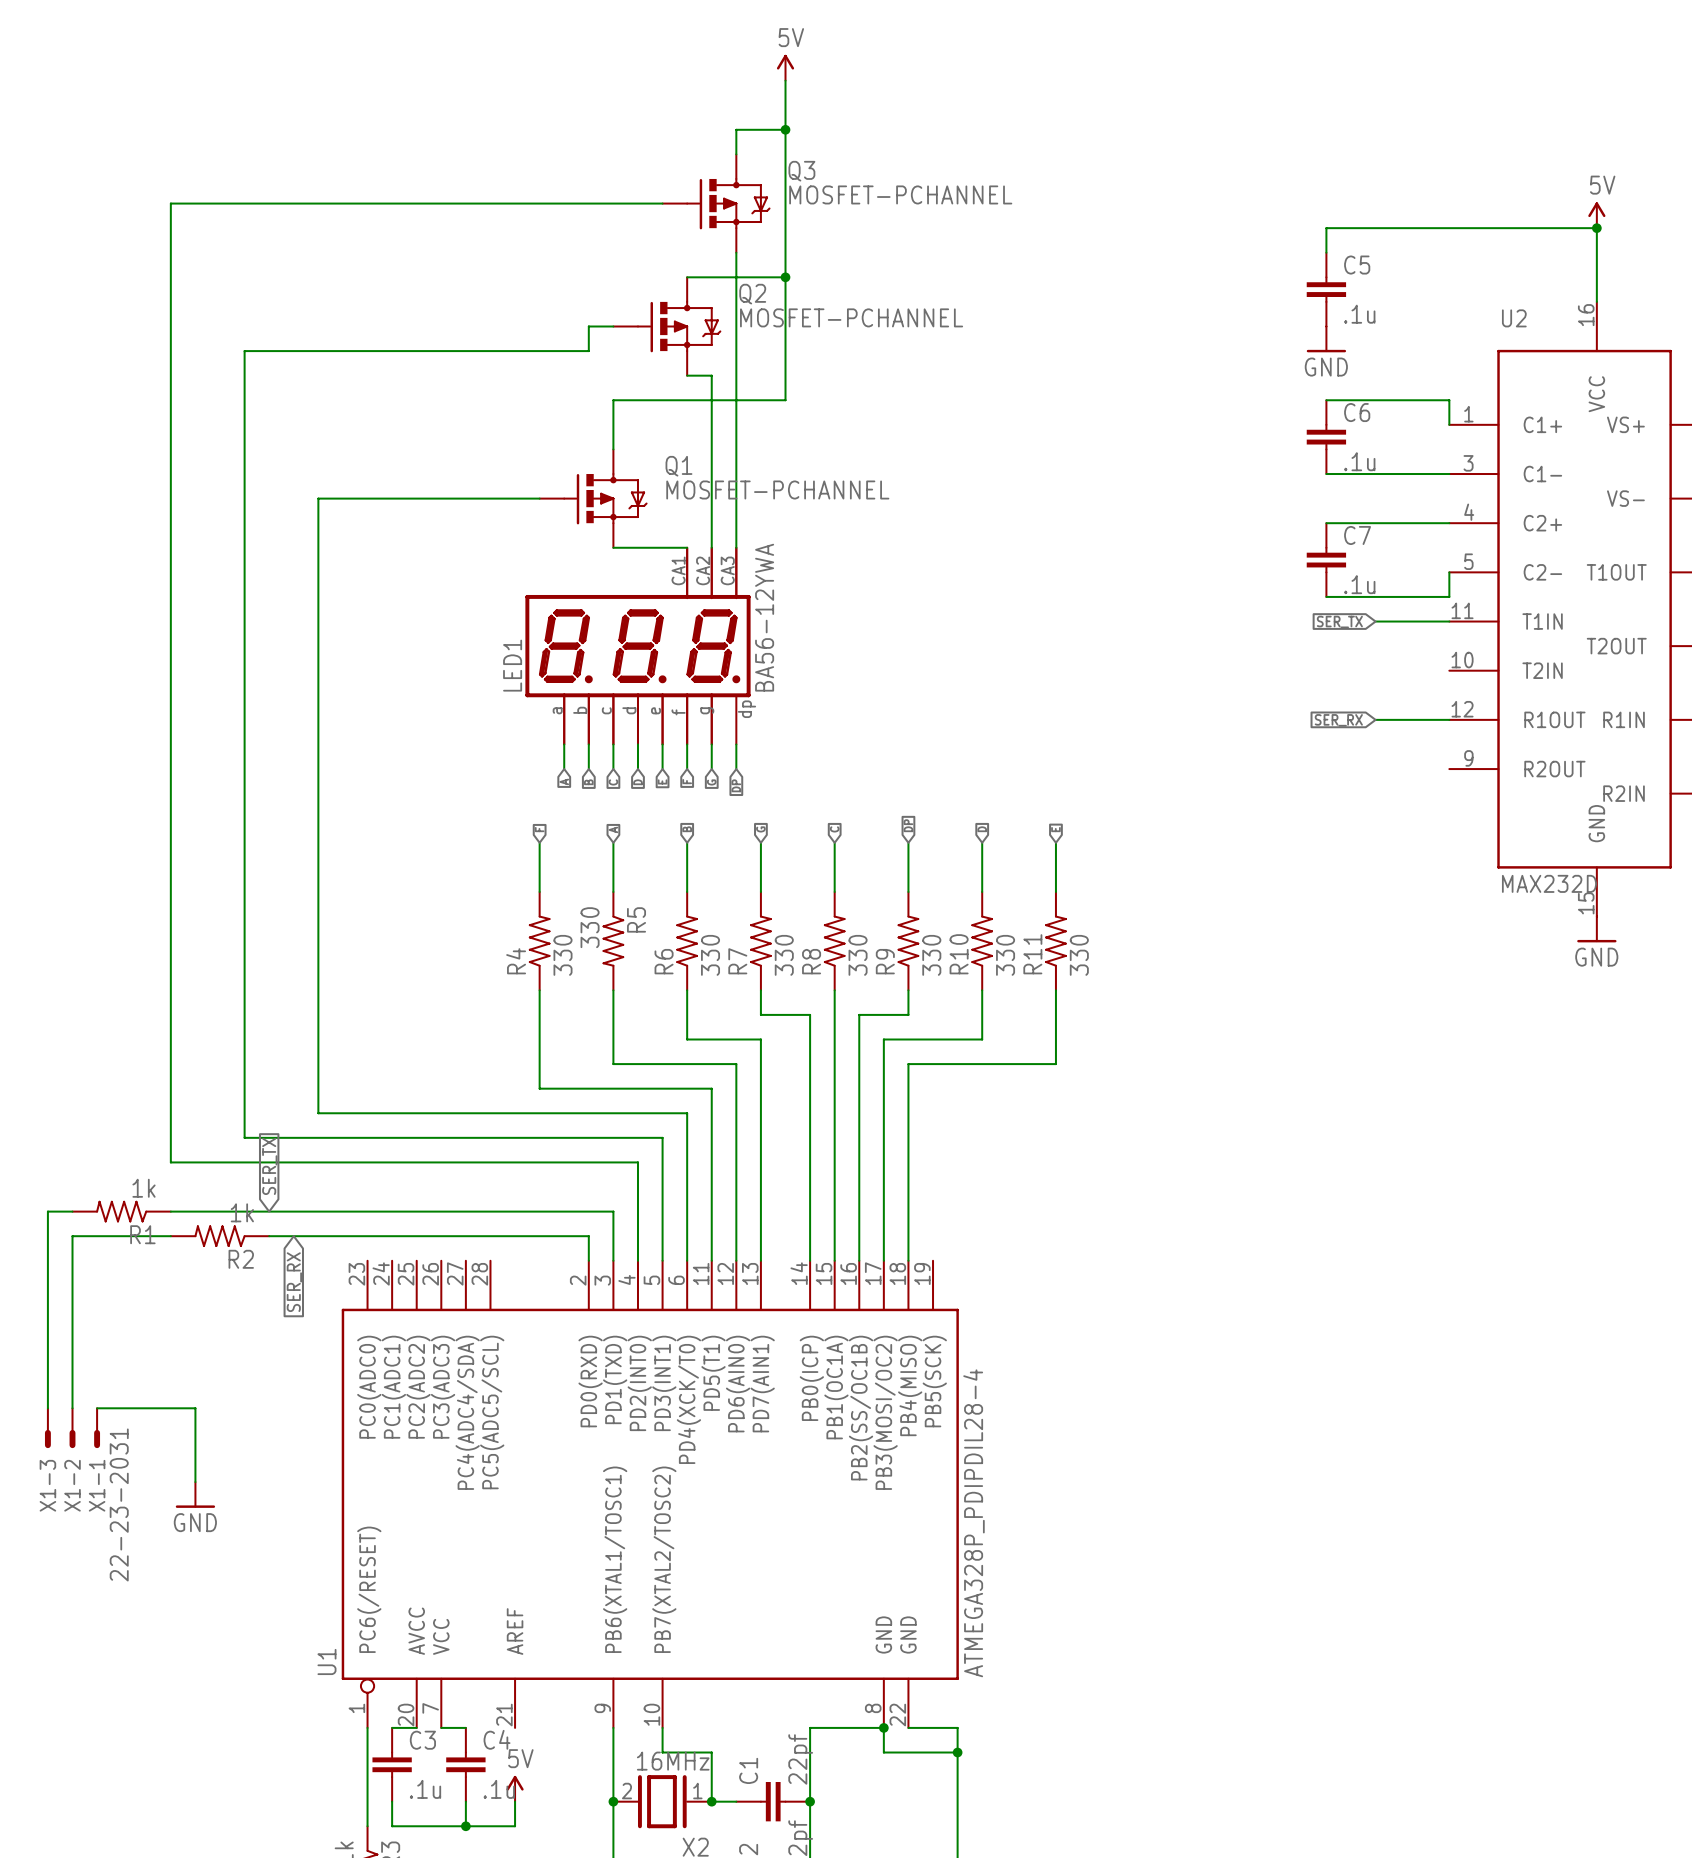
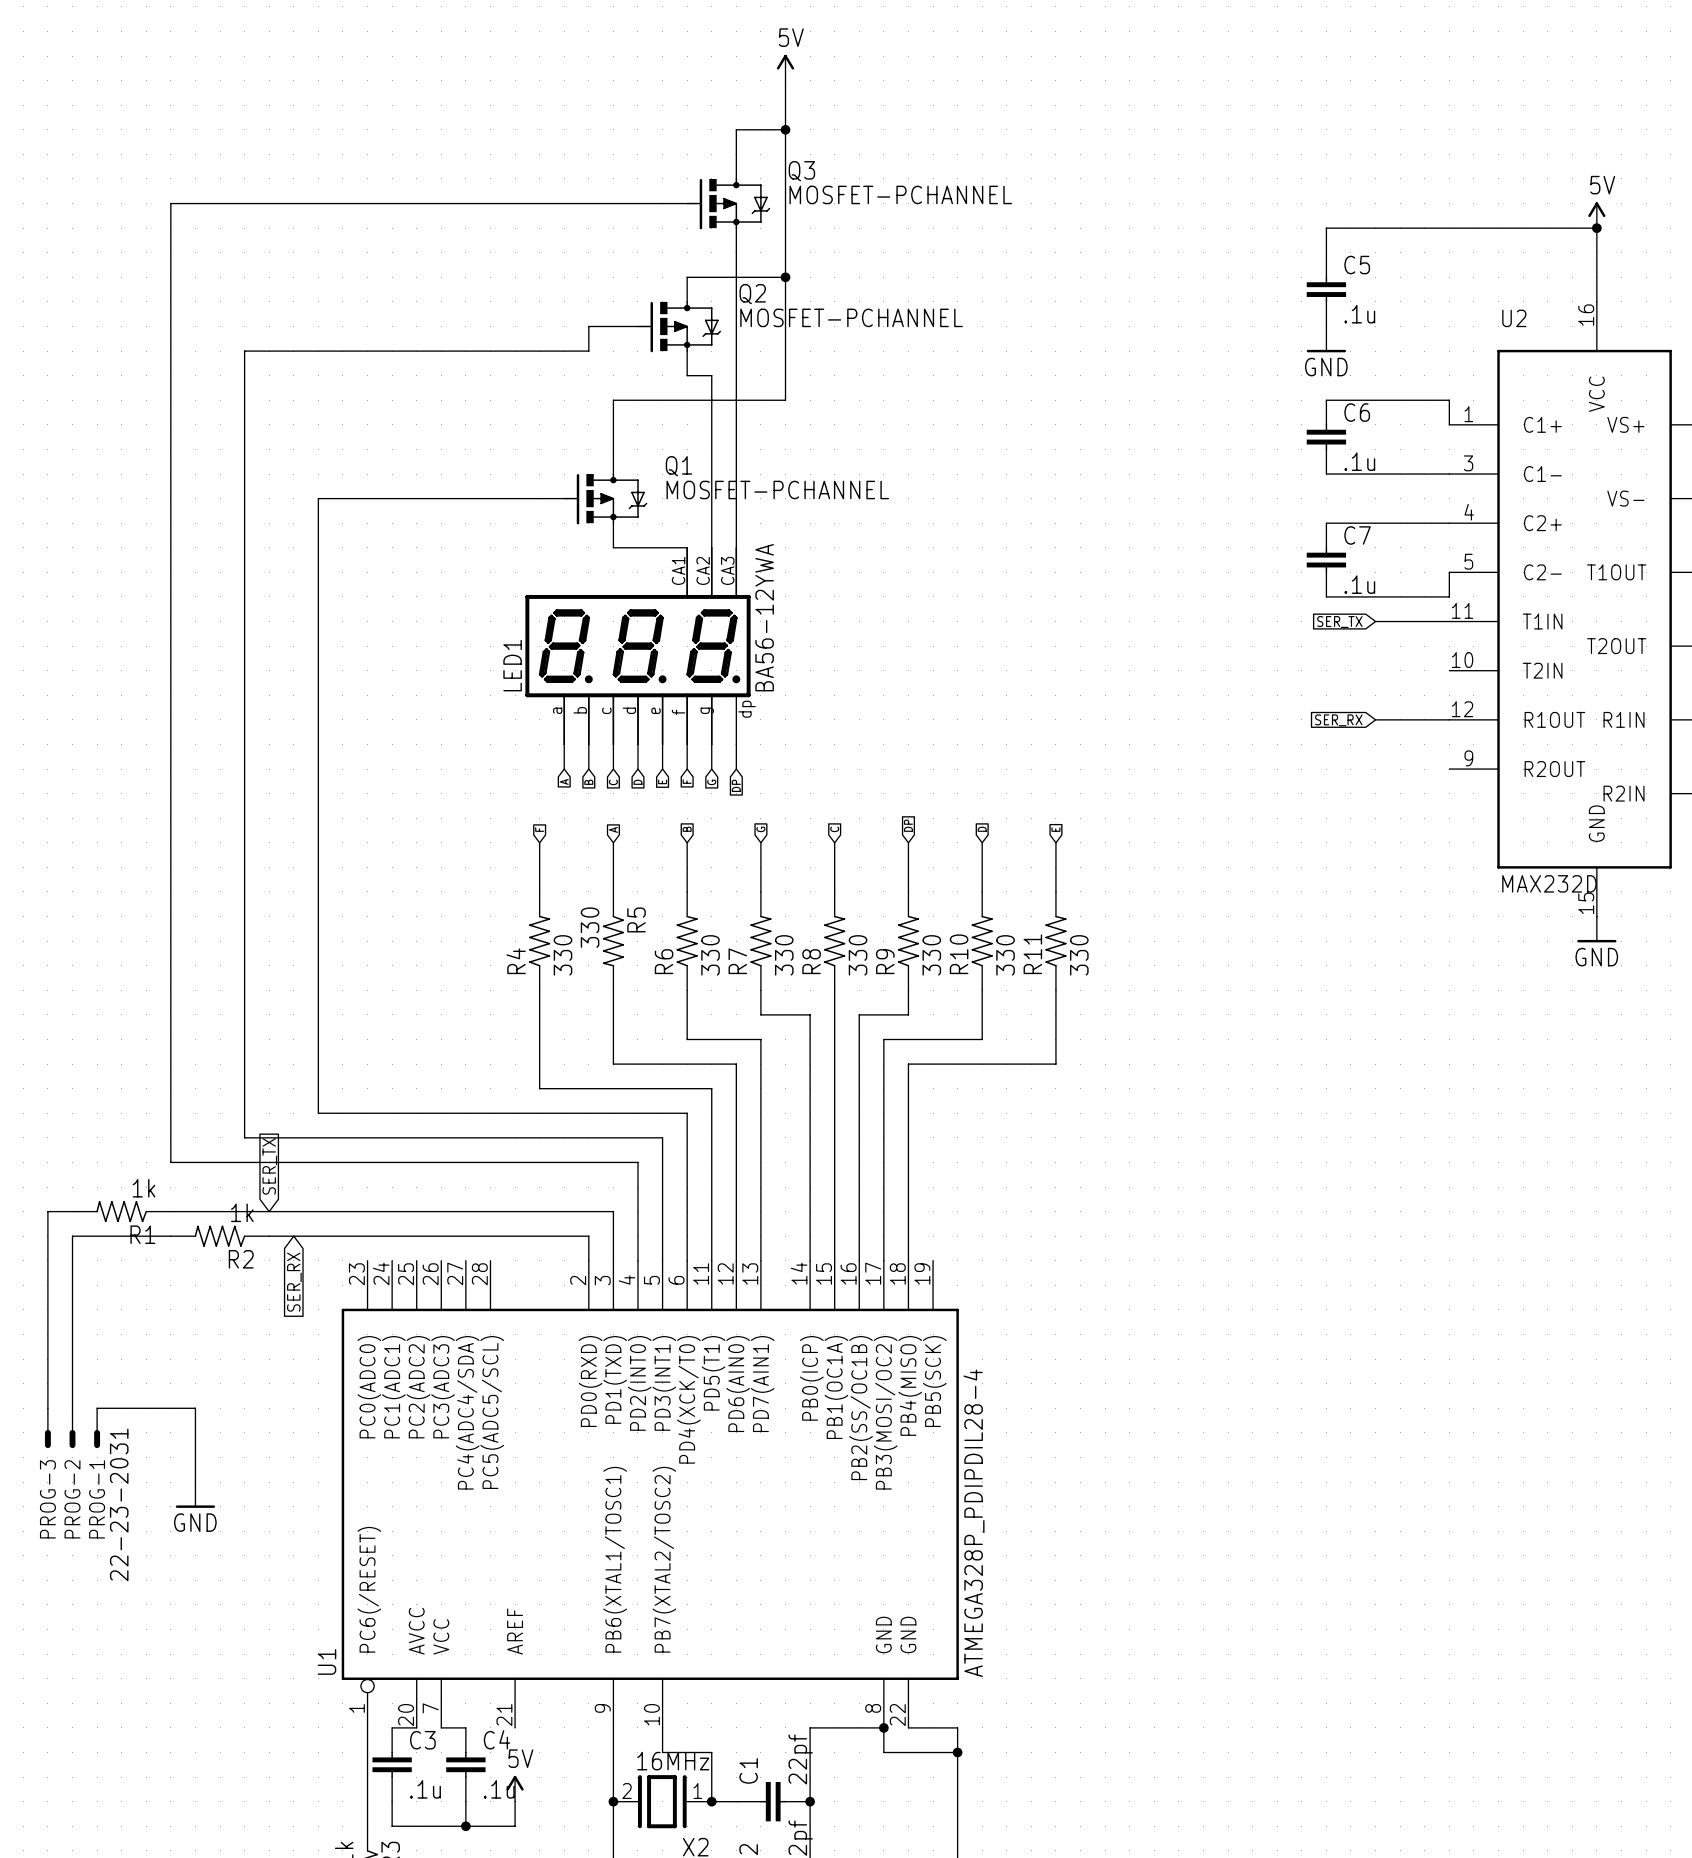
X1-3 name: X1-3 (47, 1485) -> PROG-3 (47, 1499)
X1-2 name: X1-2 (72, 1485) -> PROG-2 (72, 1499)
X1-1 name: X1-1 (97, 1485) -> PROG-1 (97, 1499)

